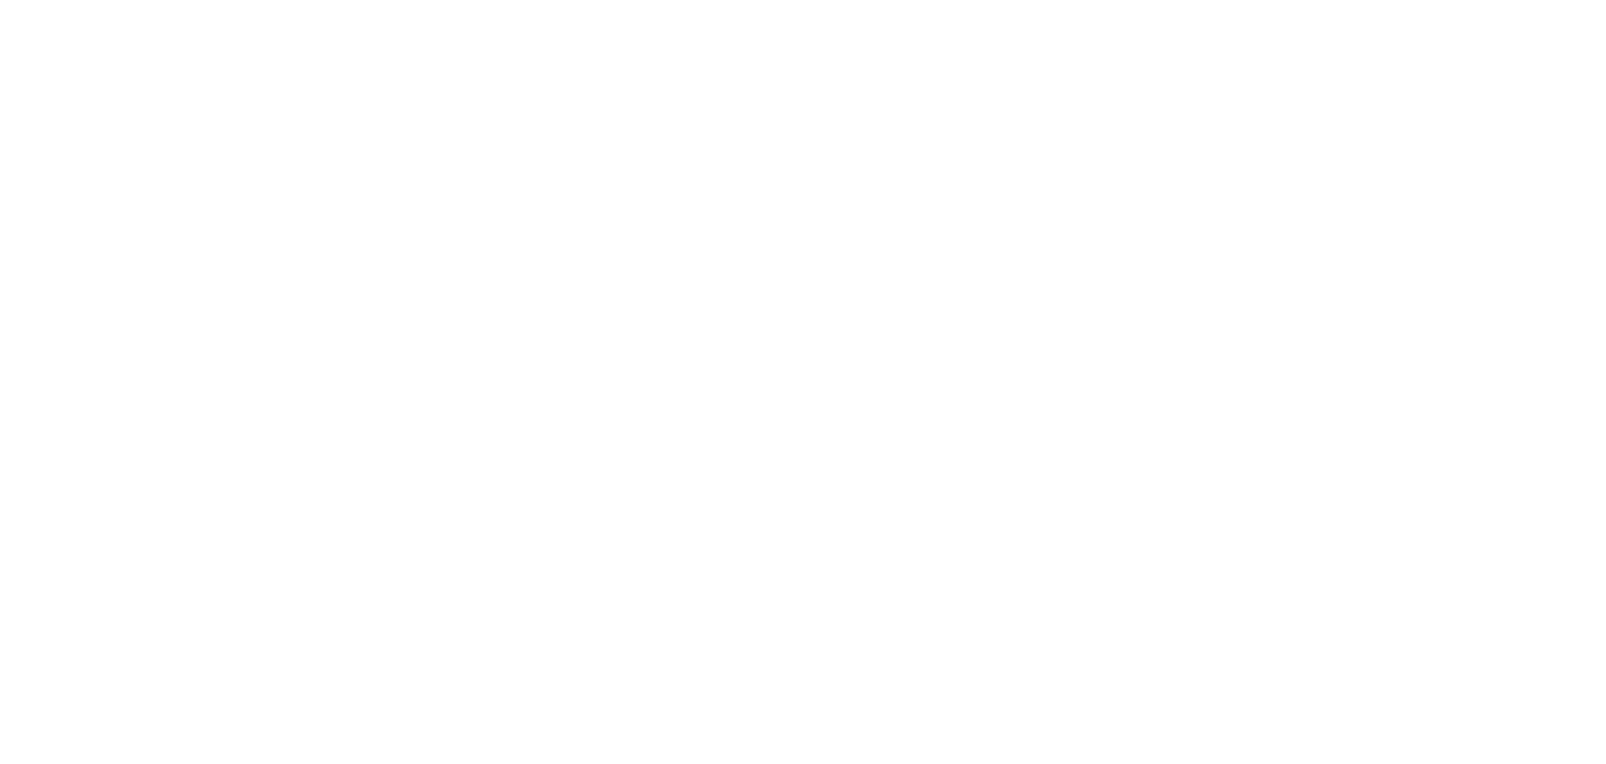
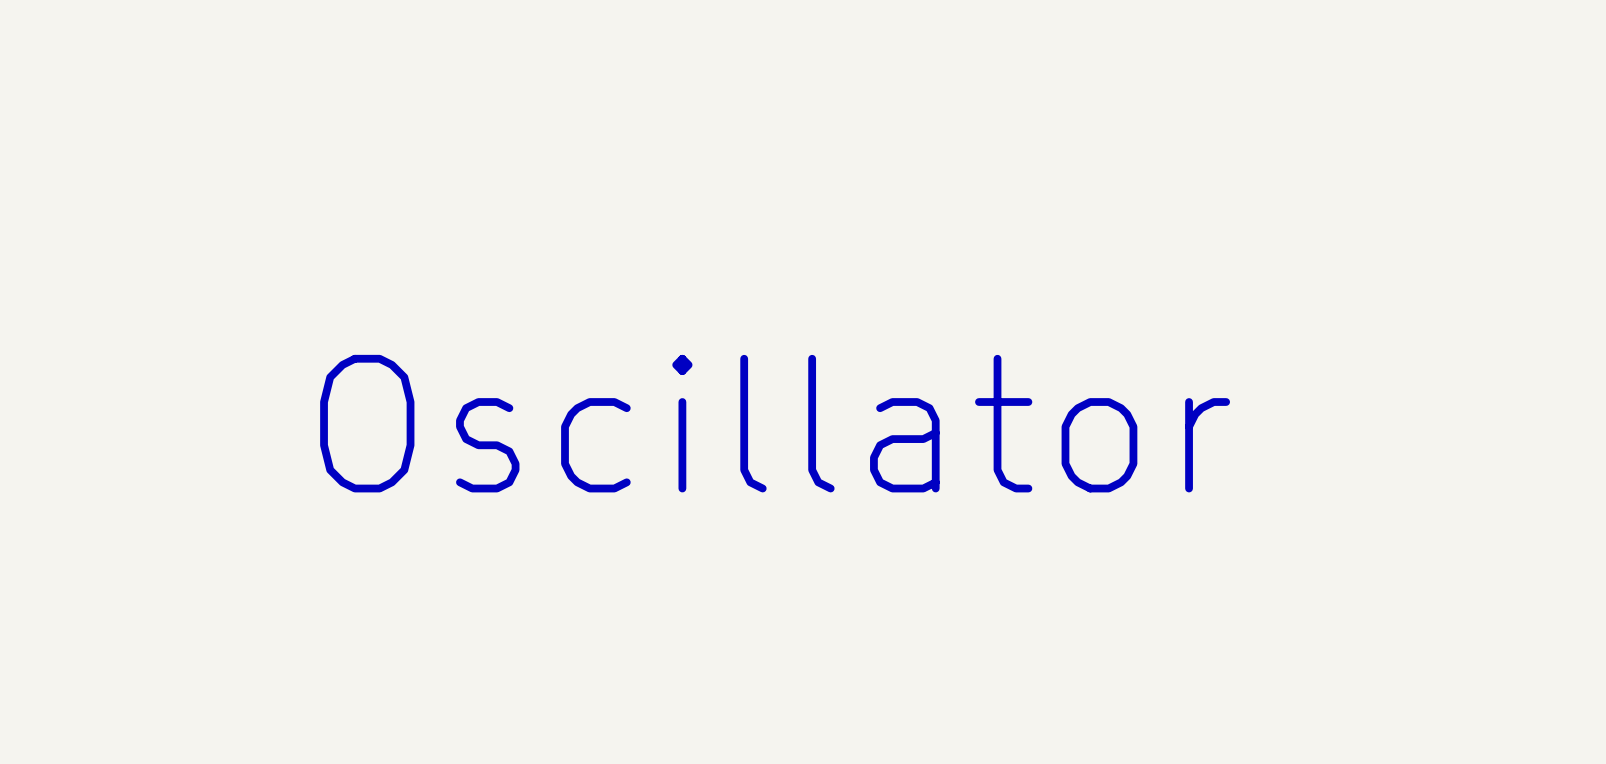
text: none -> Oscillator (775, 423)

